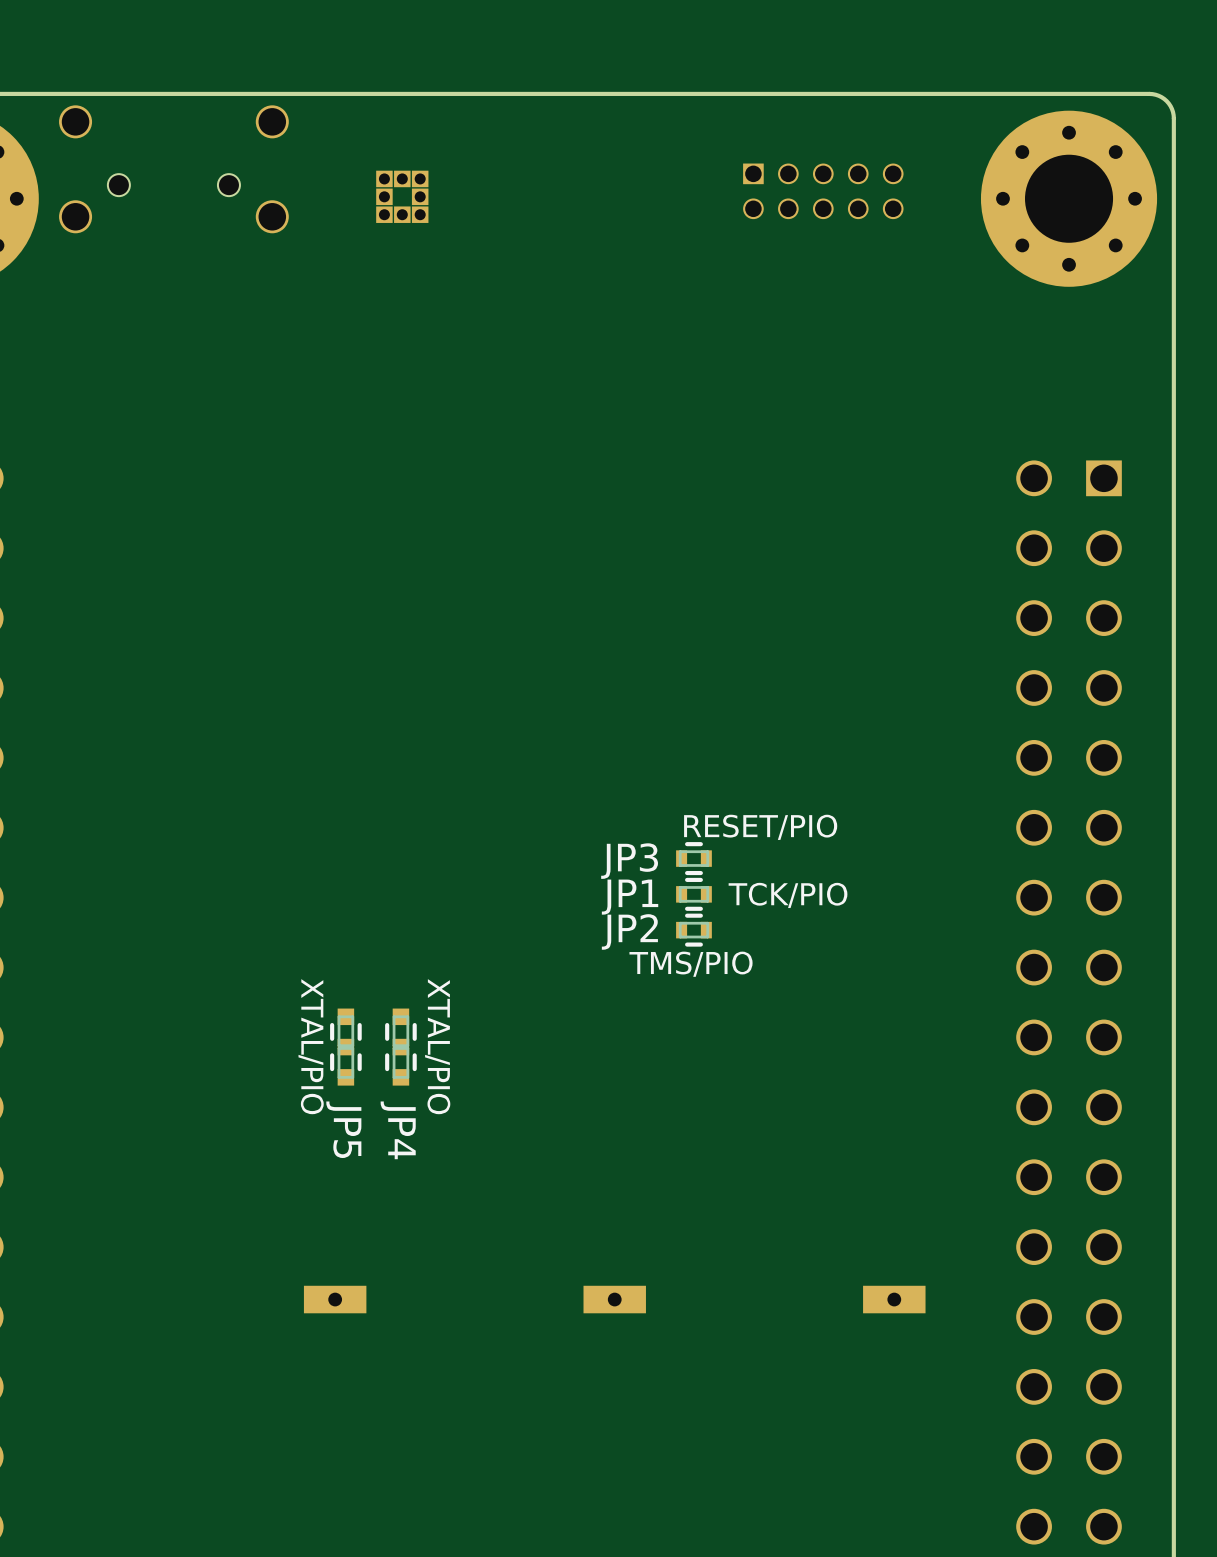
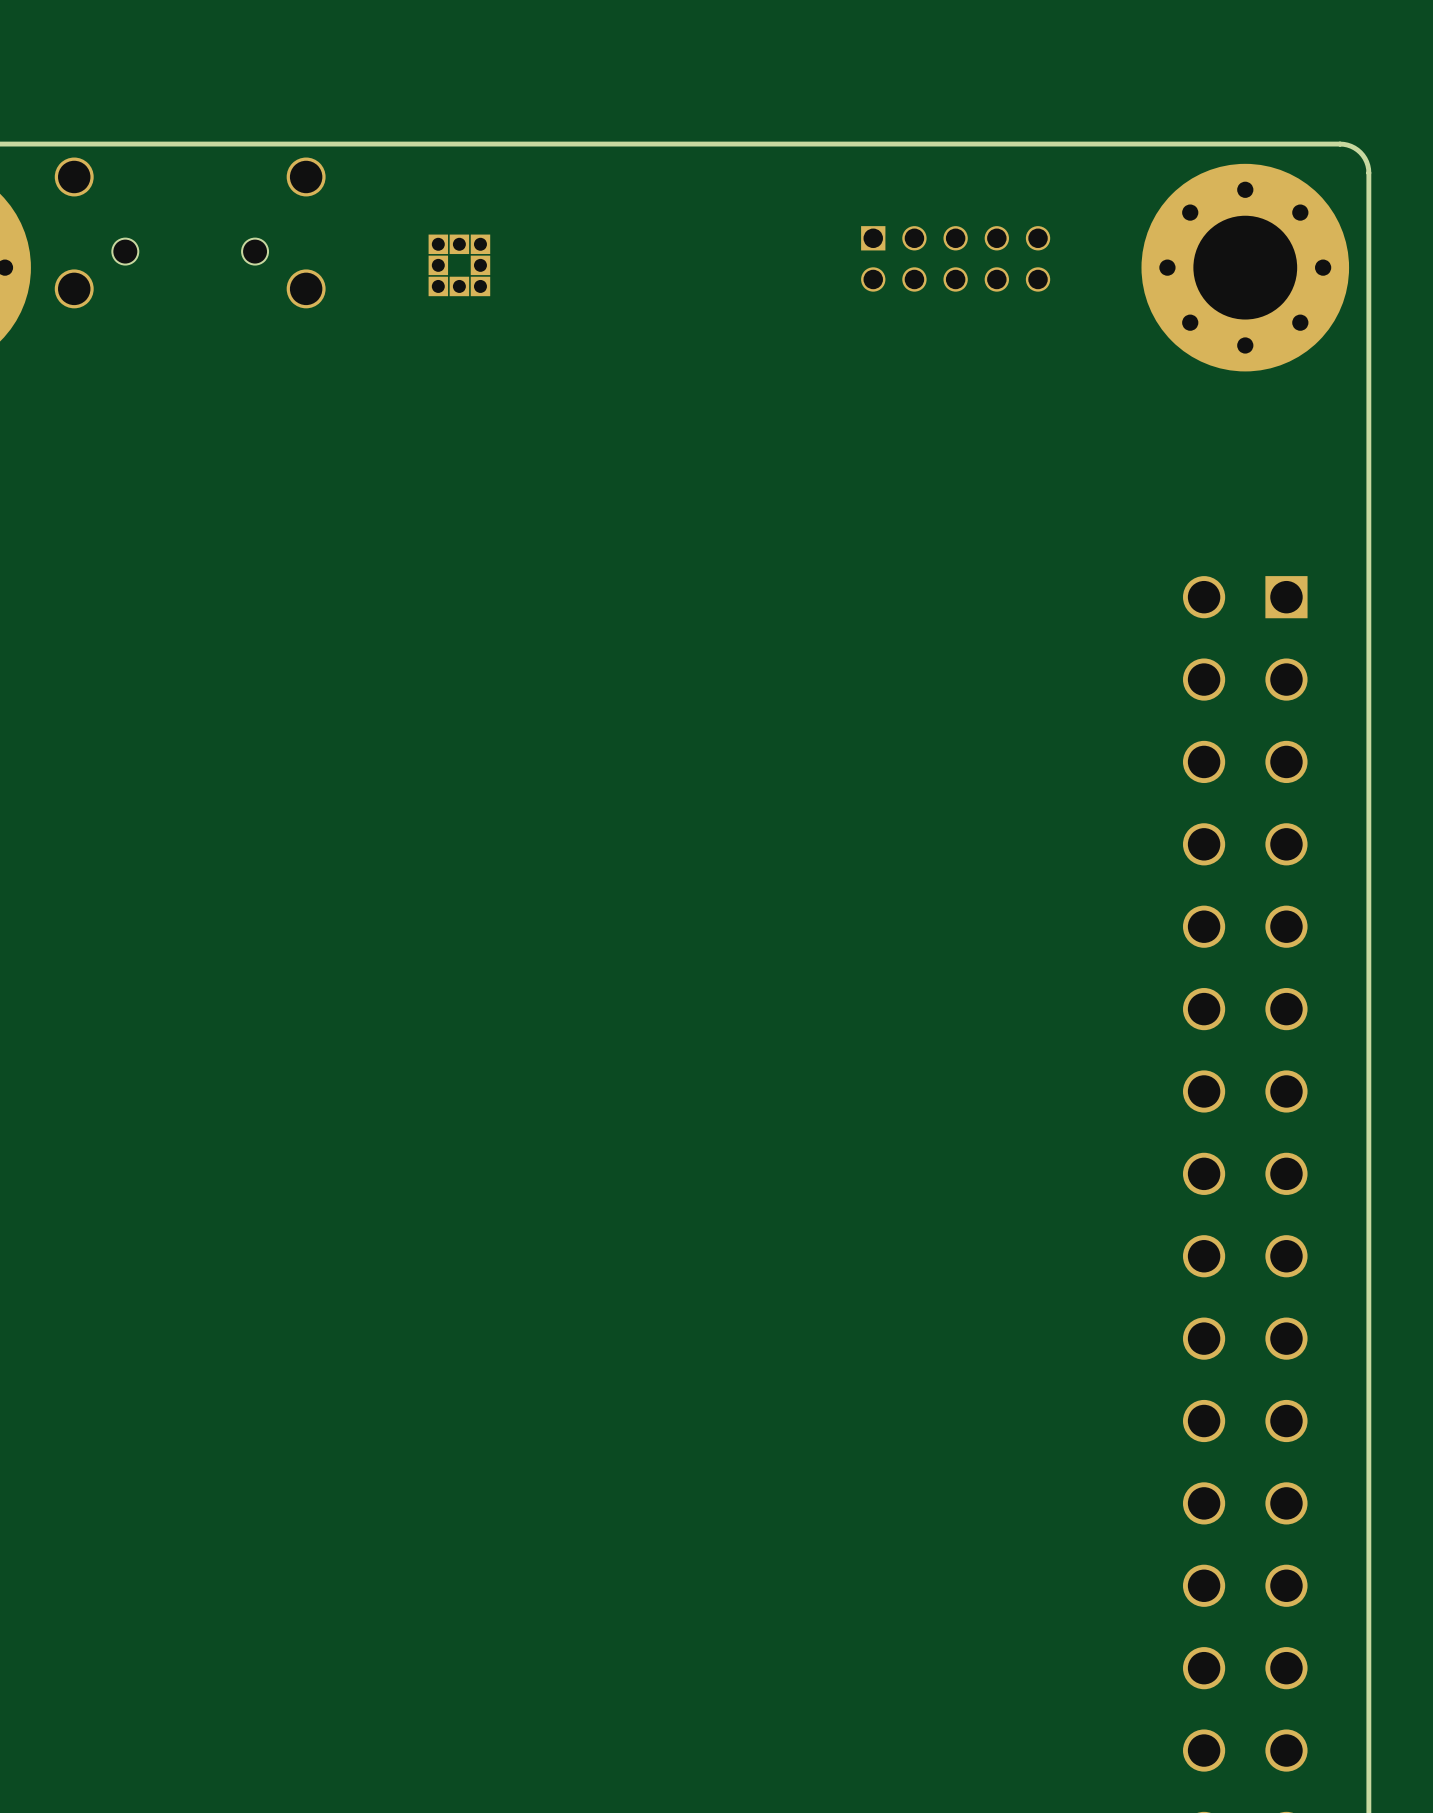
JP3: RESET/PIO (693, 858) -> none
JP1: TCK/PIO (693, 894) -> none
JP2: TMS/PIO (693, 930) -> none
JP5: XTAL/PIO (345, 1047) -> none
JP4: XTAL/PIO (400, 1047) -> none
part: (335, 1299) -> none
part: (614, 1299) -> none
part: (894, 1299) -> none

